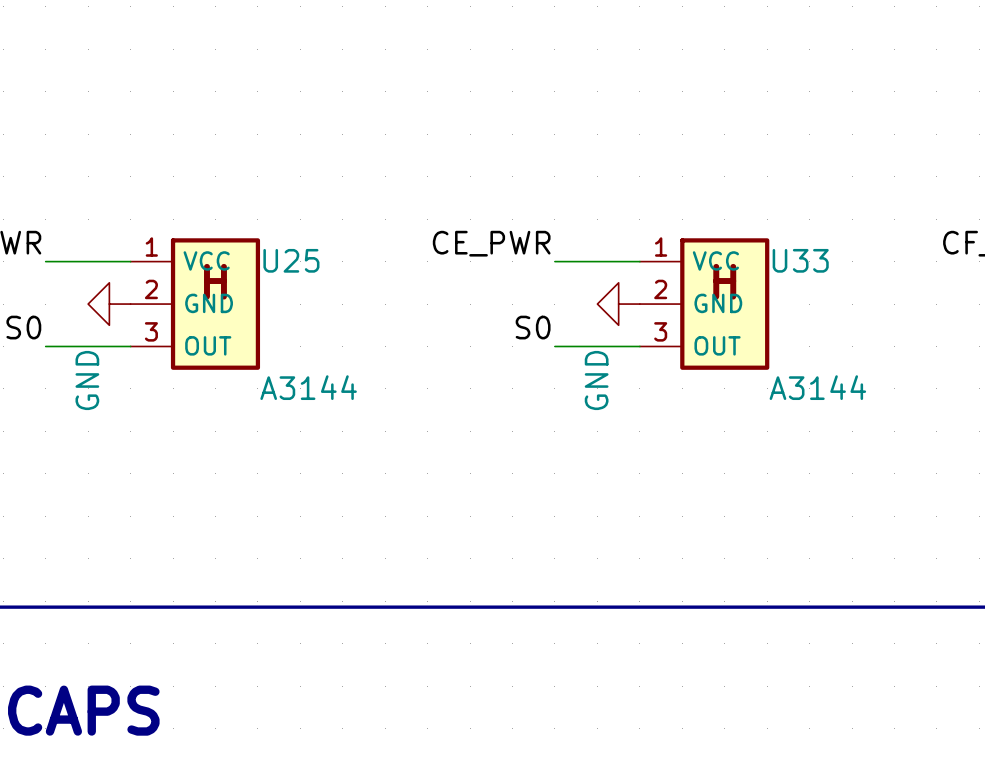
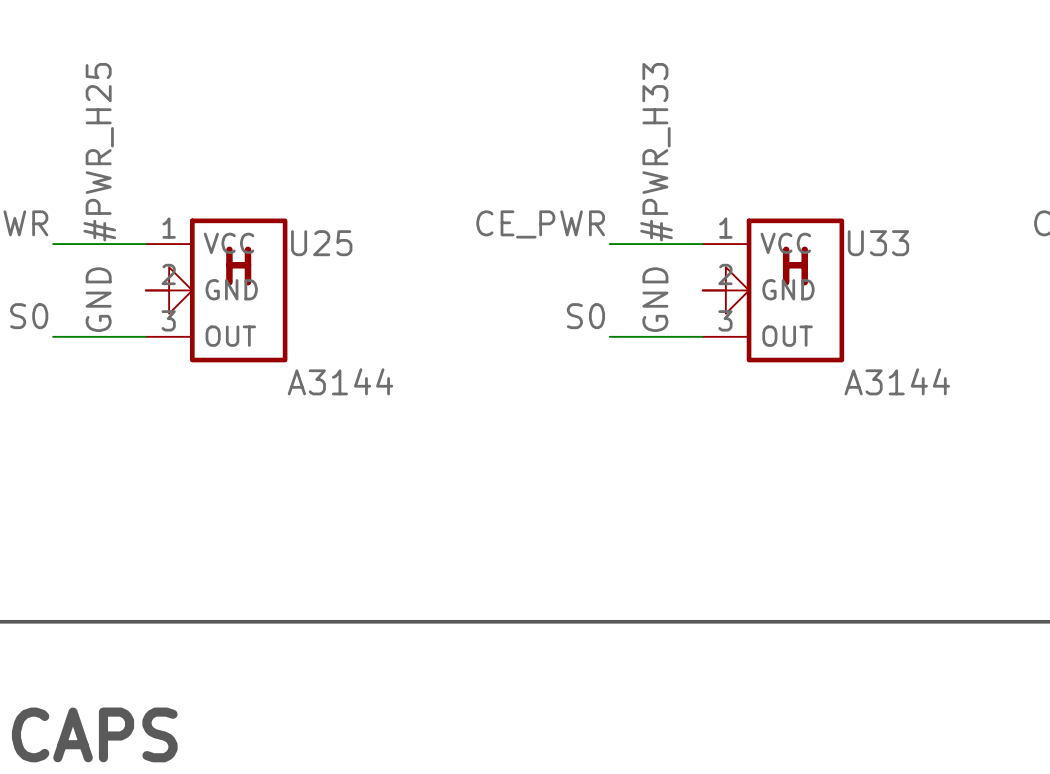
power symbol: GND (109, 304) -> none
#PWR_H25: none -> GND (169, 290)
power symbol: GND (618, 304) -> none
#PWR_H33: none -> GND (725, 290)

